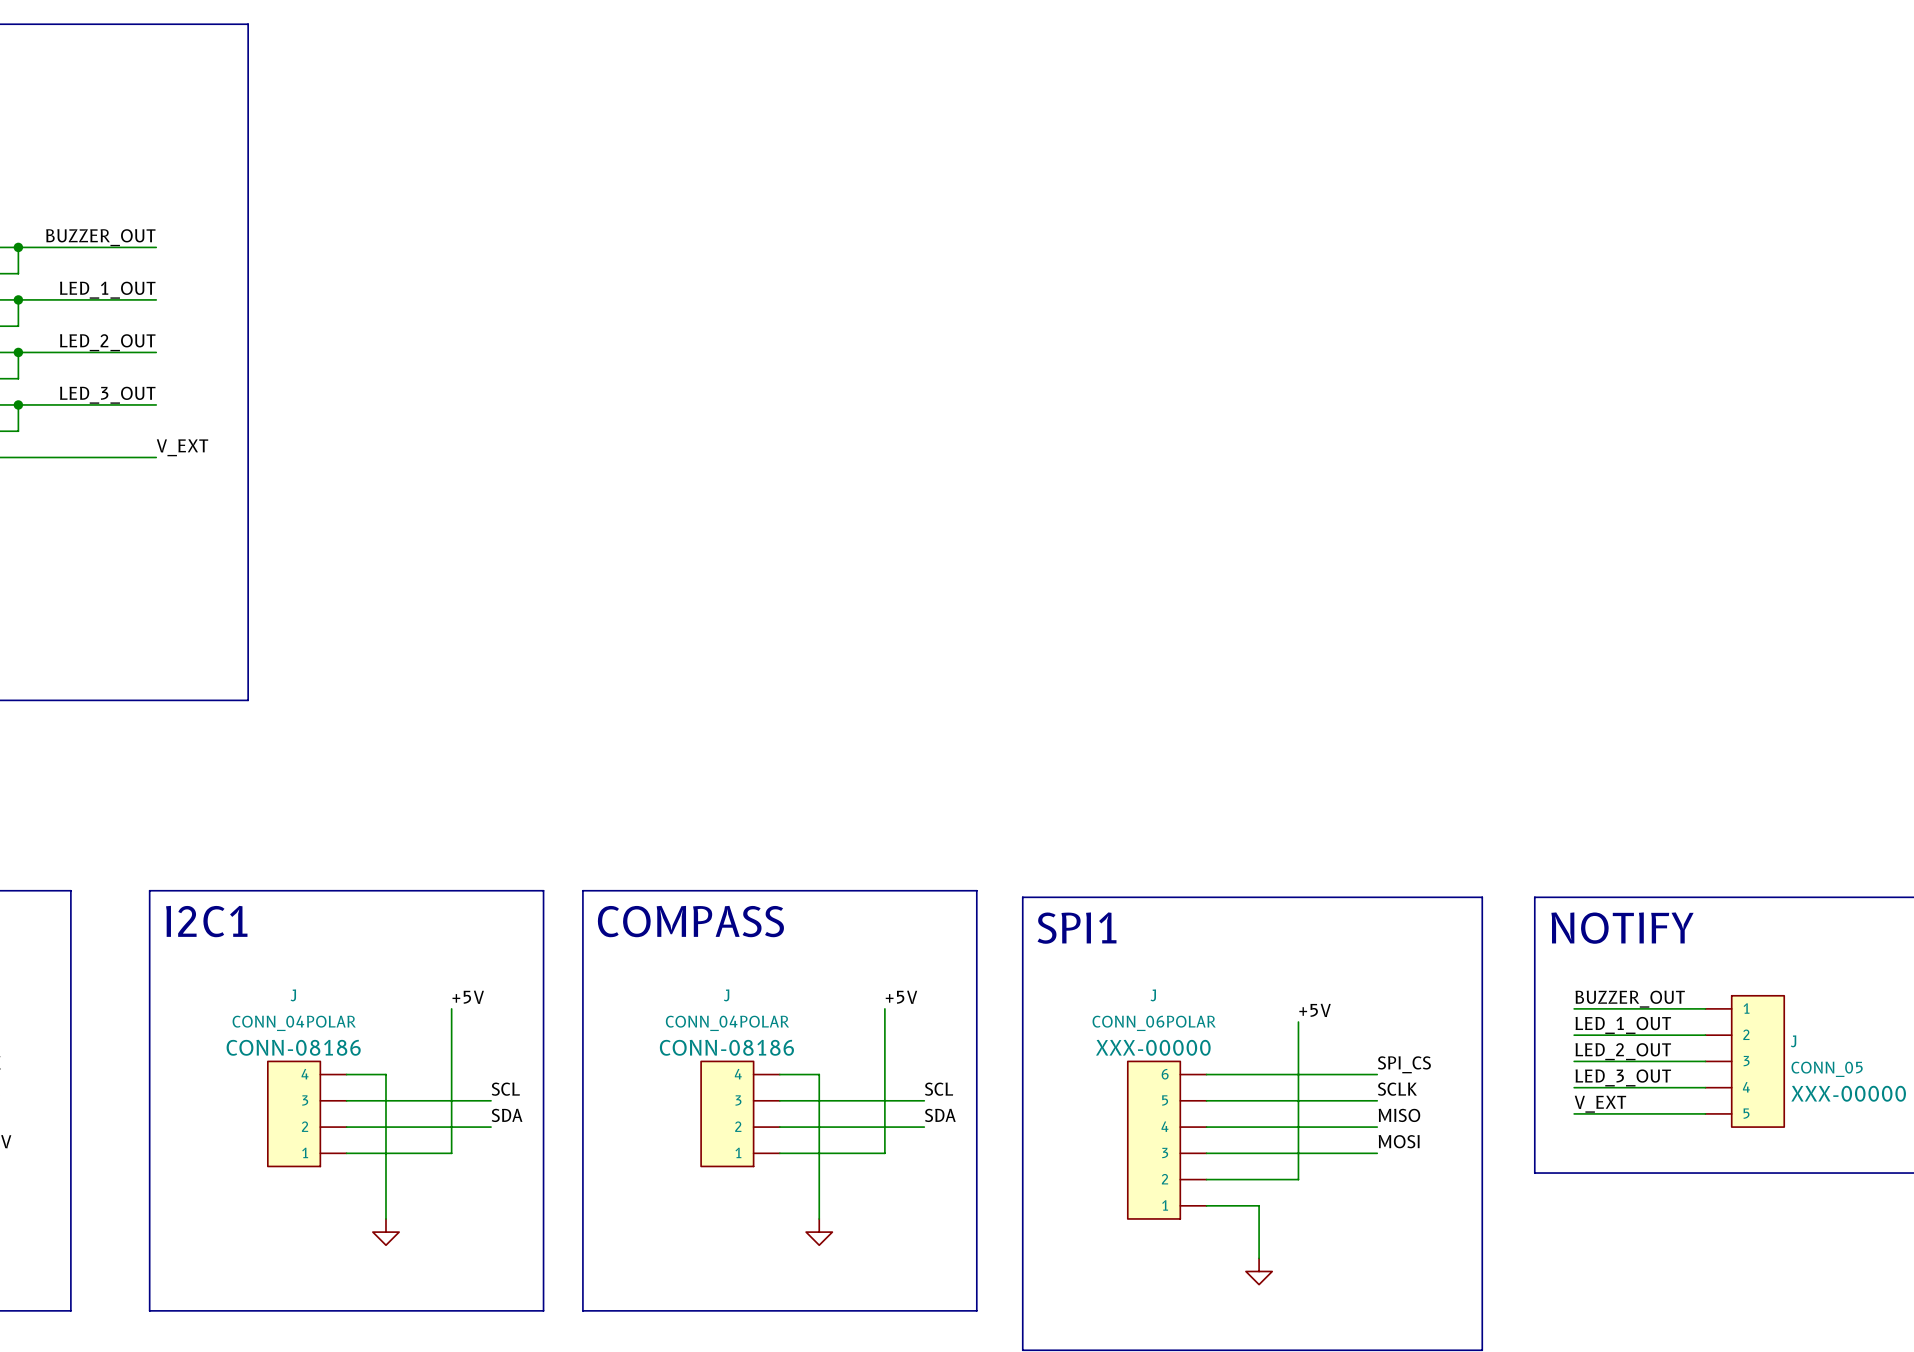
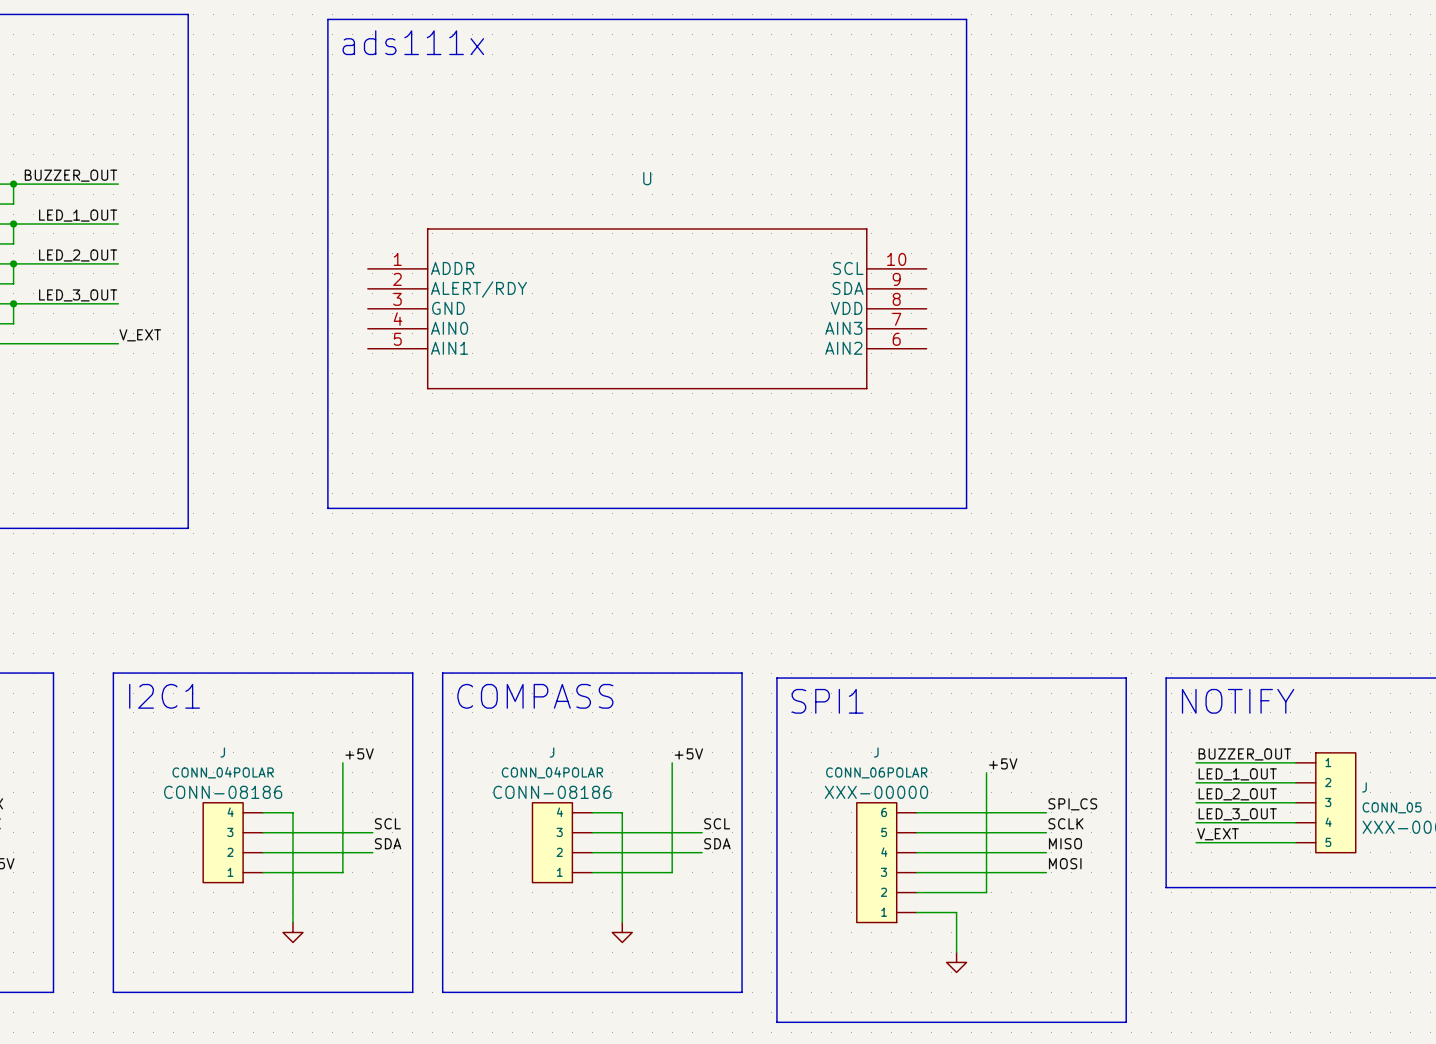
line: none -> (327, 19) (327, 508) (966, 508) (966, 19) (327, 19)
text: none -> ads111x (413, 42)
U: none -> (647, 308)

